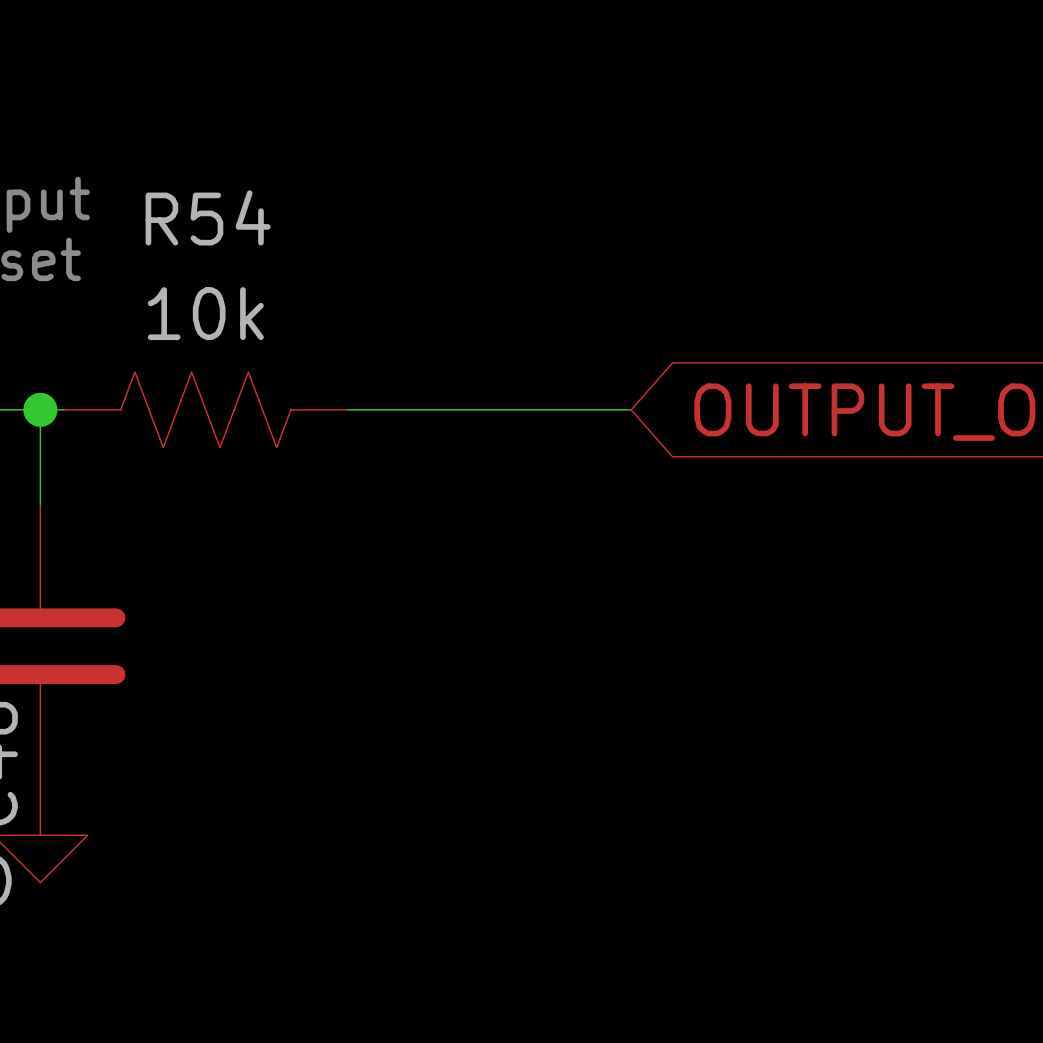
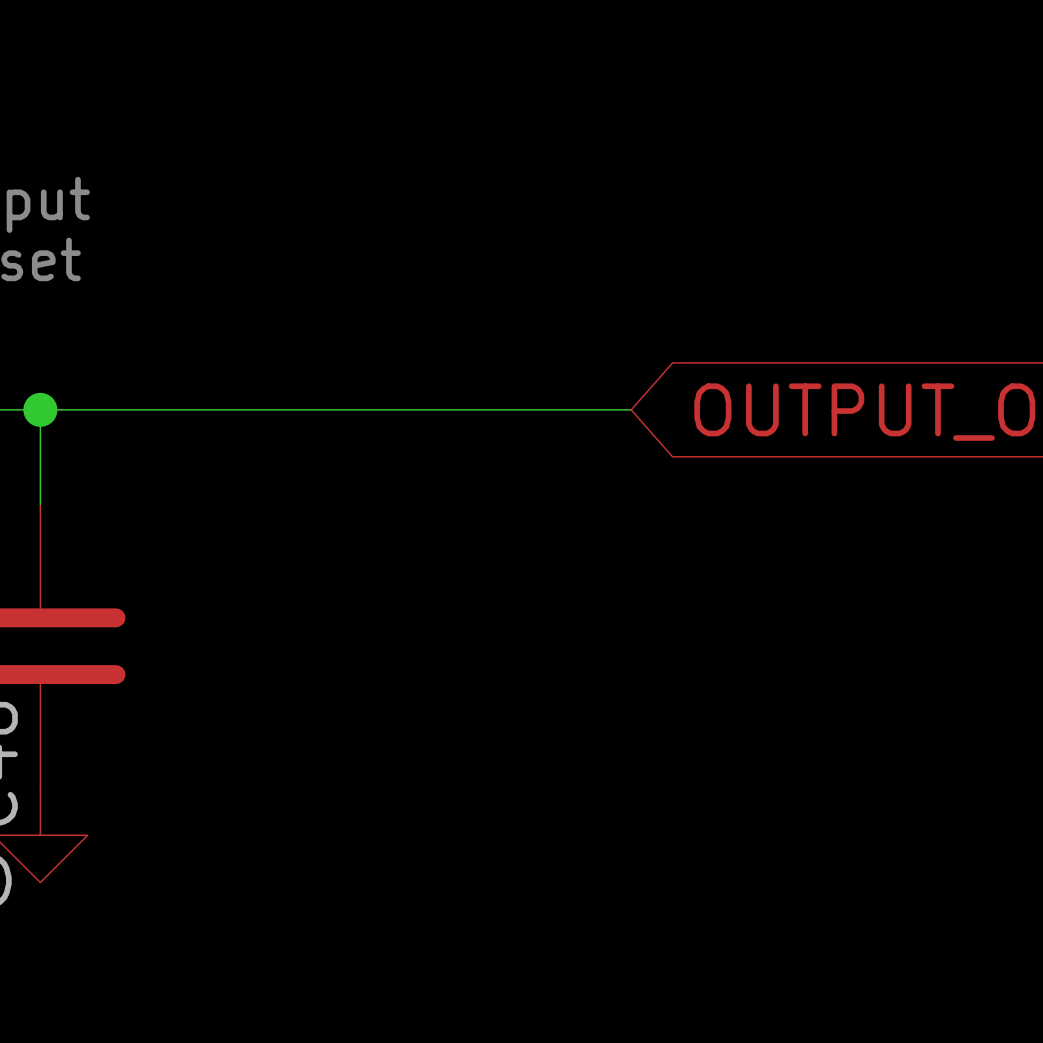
wire: none -> (64, 409) (347, 409)
R54: 10k (205, 409) -> none

